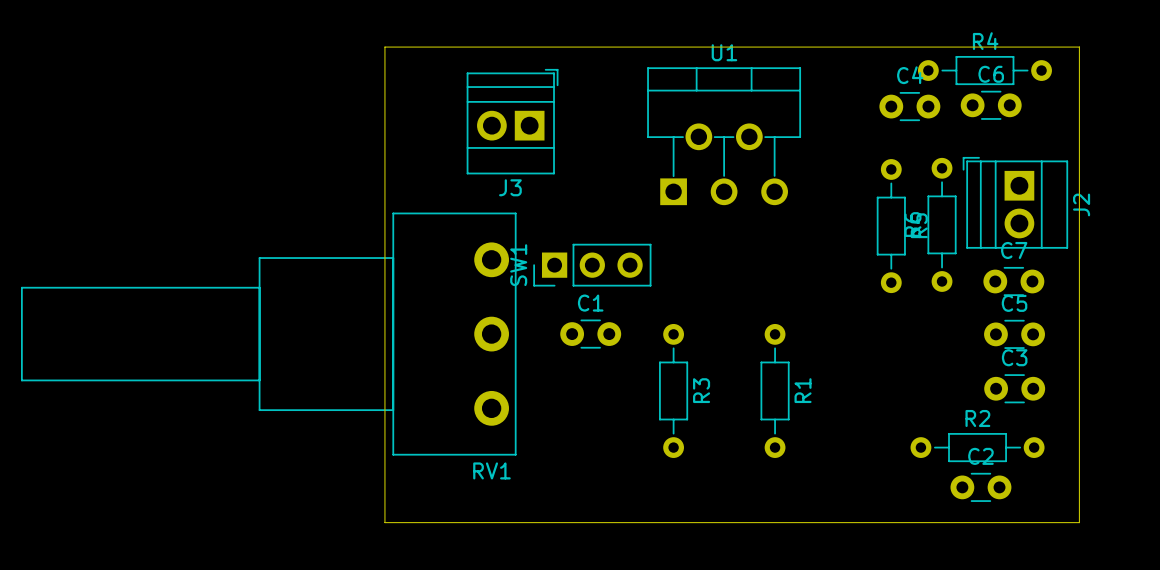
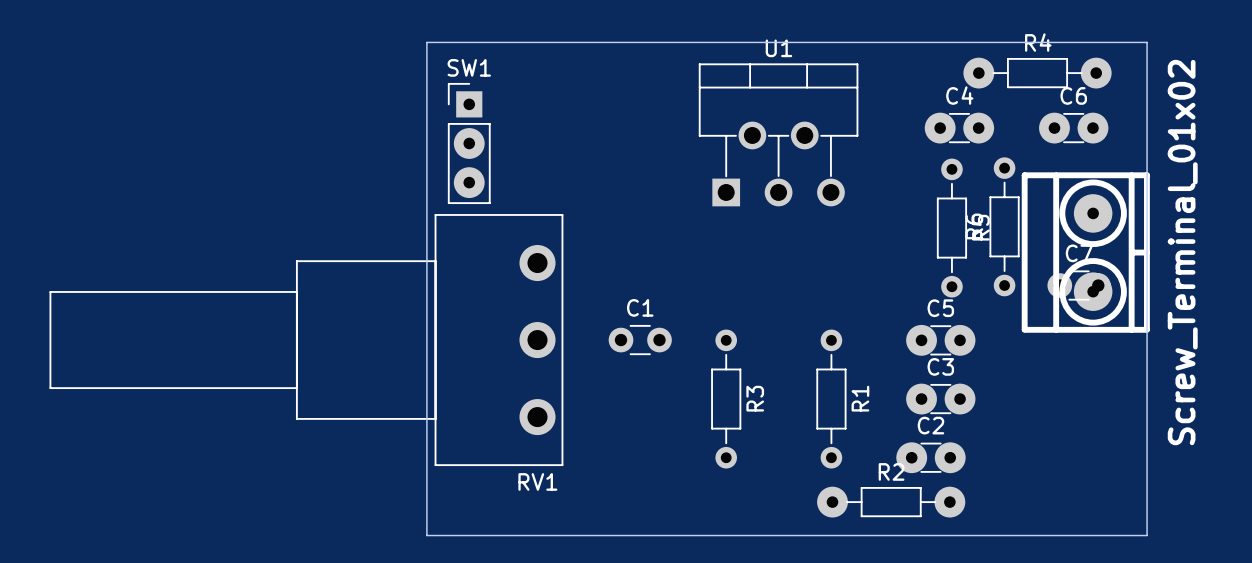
R4 footprint: [917, 55, 1052, 86] -> [963, 57, 1112, 89]
C6 footprint: [960, 90, 1022, 120] -> [1039, 112, 1109, 144]
C4 footprint: [879, 92, 941, 122] -> [924, 112, 995, 144]
J3: (512, 121) -> none
J2: (1015, 202) -> none
SW1 footprint: [533, 243, 652, 287] -> [447, 82, 491, 205]
part: none -> Screw_Terminal_01x02 (1085, 252)
SW1 name position: SW1 (518, 265) -> SW1 (469, 67)
C5 footprint: [984, 319, 1045, 349] -> [906, 324, 976, 356]
C3 footprint: [984, 374, 1046, 404] -> [906, 383, 976, 415]
R2 footprint: [910, 433, 1045, 463] -> [817, 486, 966, 518]
C2 footprint: [950, 472, 1012, 502] -> [896, 442, 966, 474]

